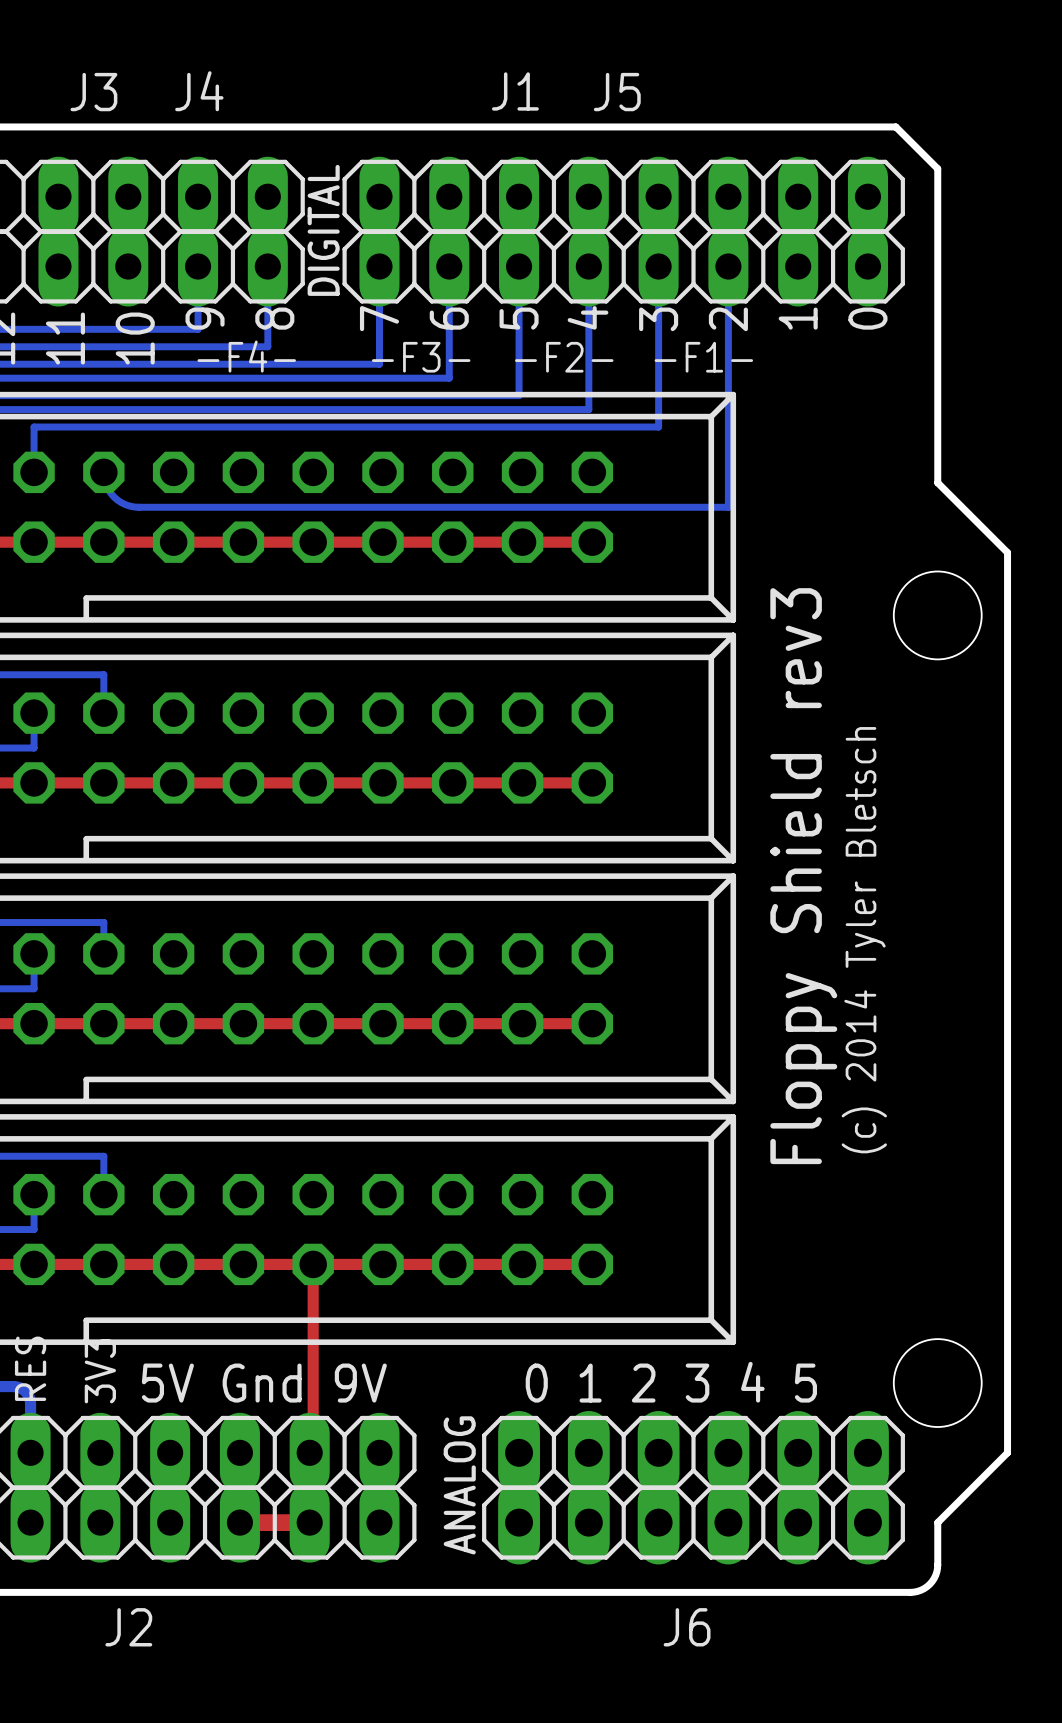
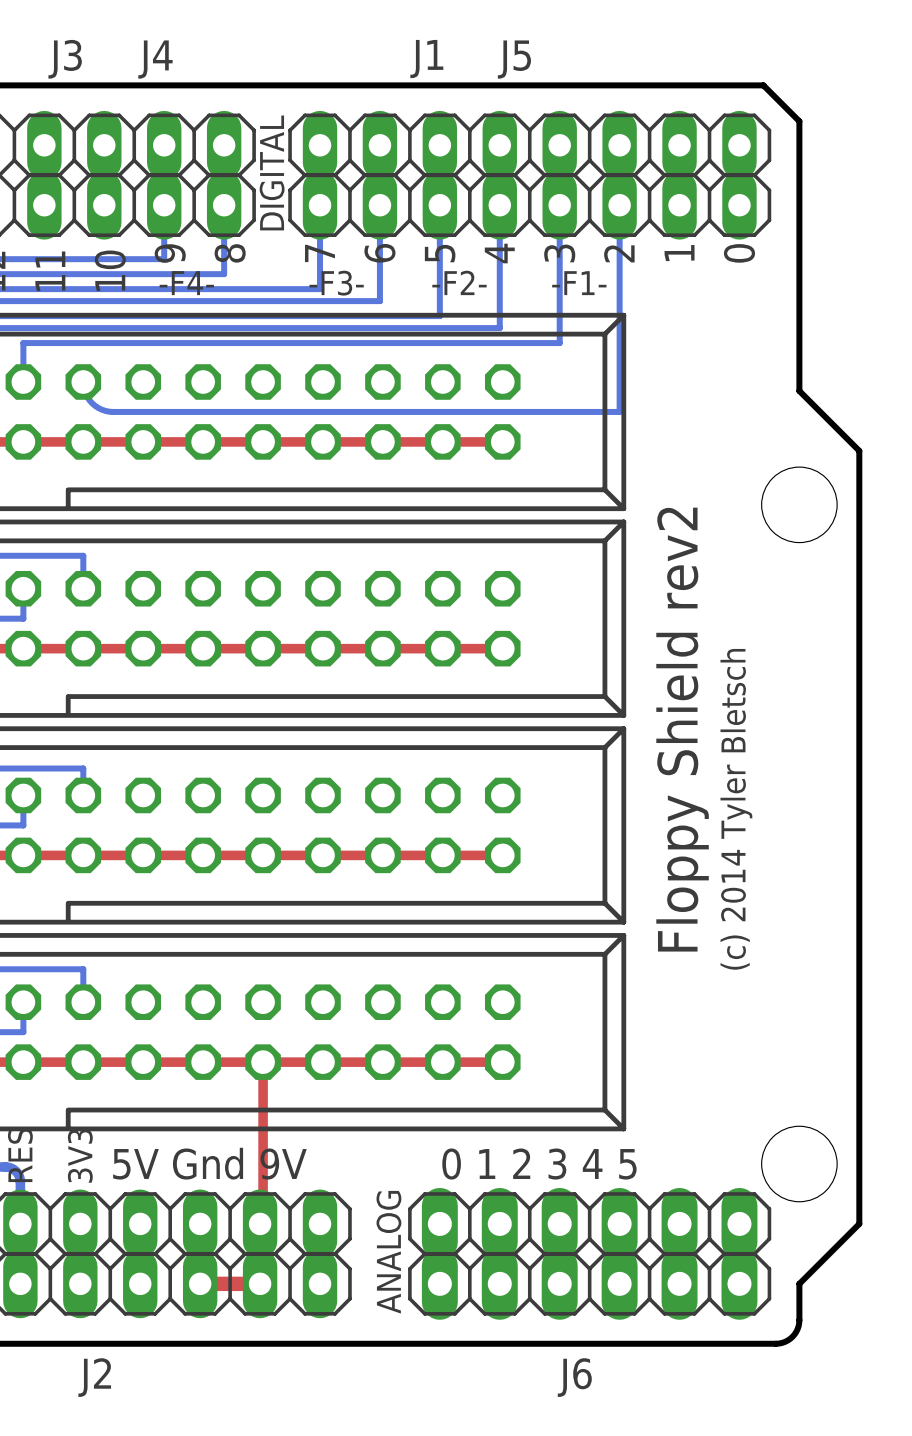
text: Floppy Shield rev3 (803, 876) -> Floppy Shield rev2 (682, 729)

